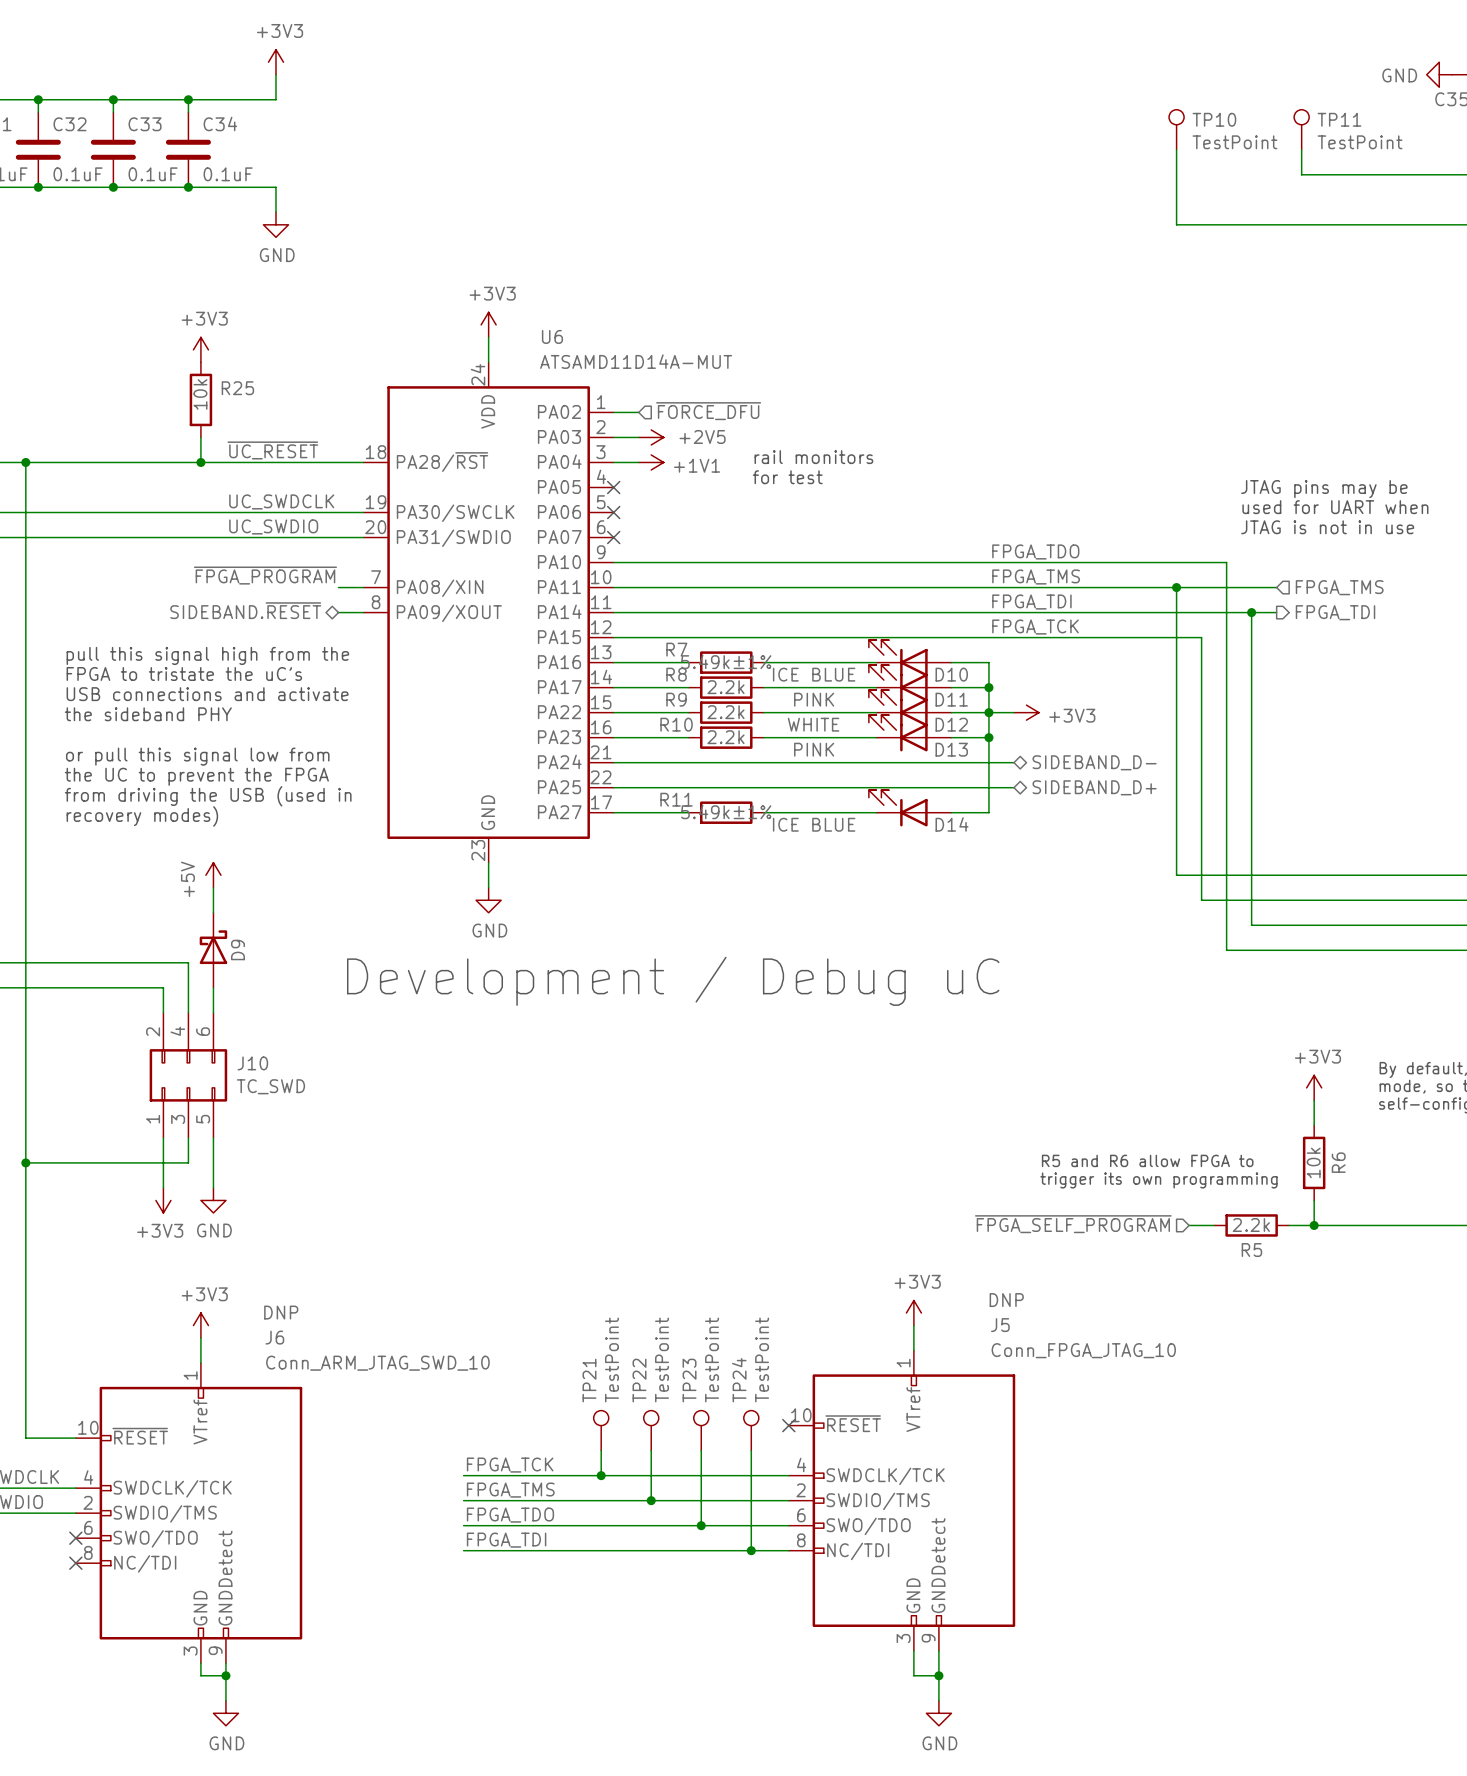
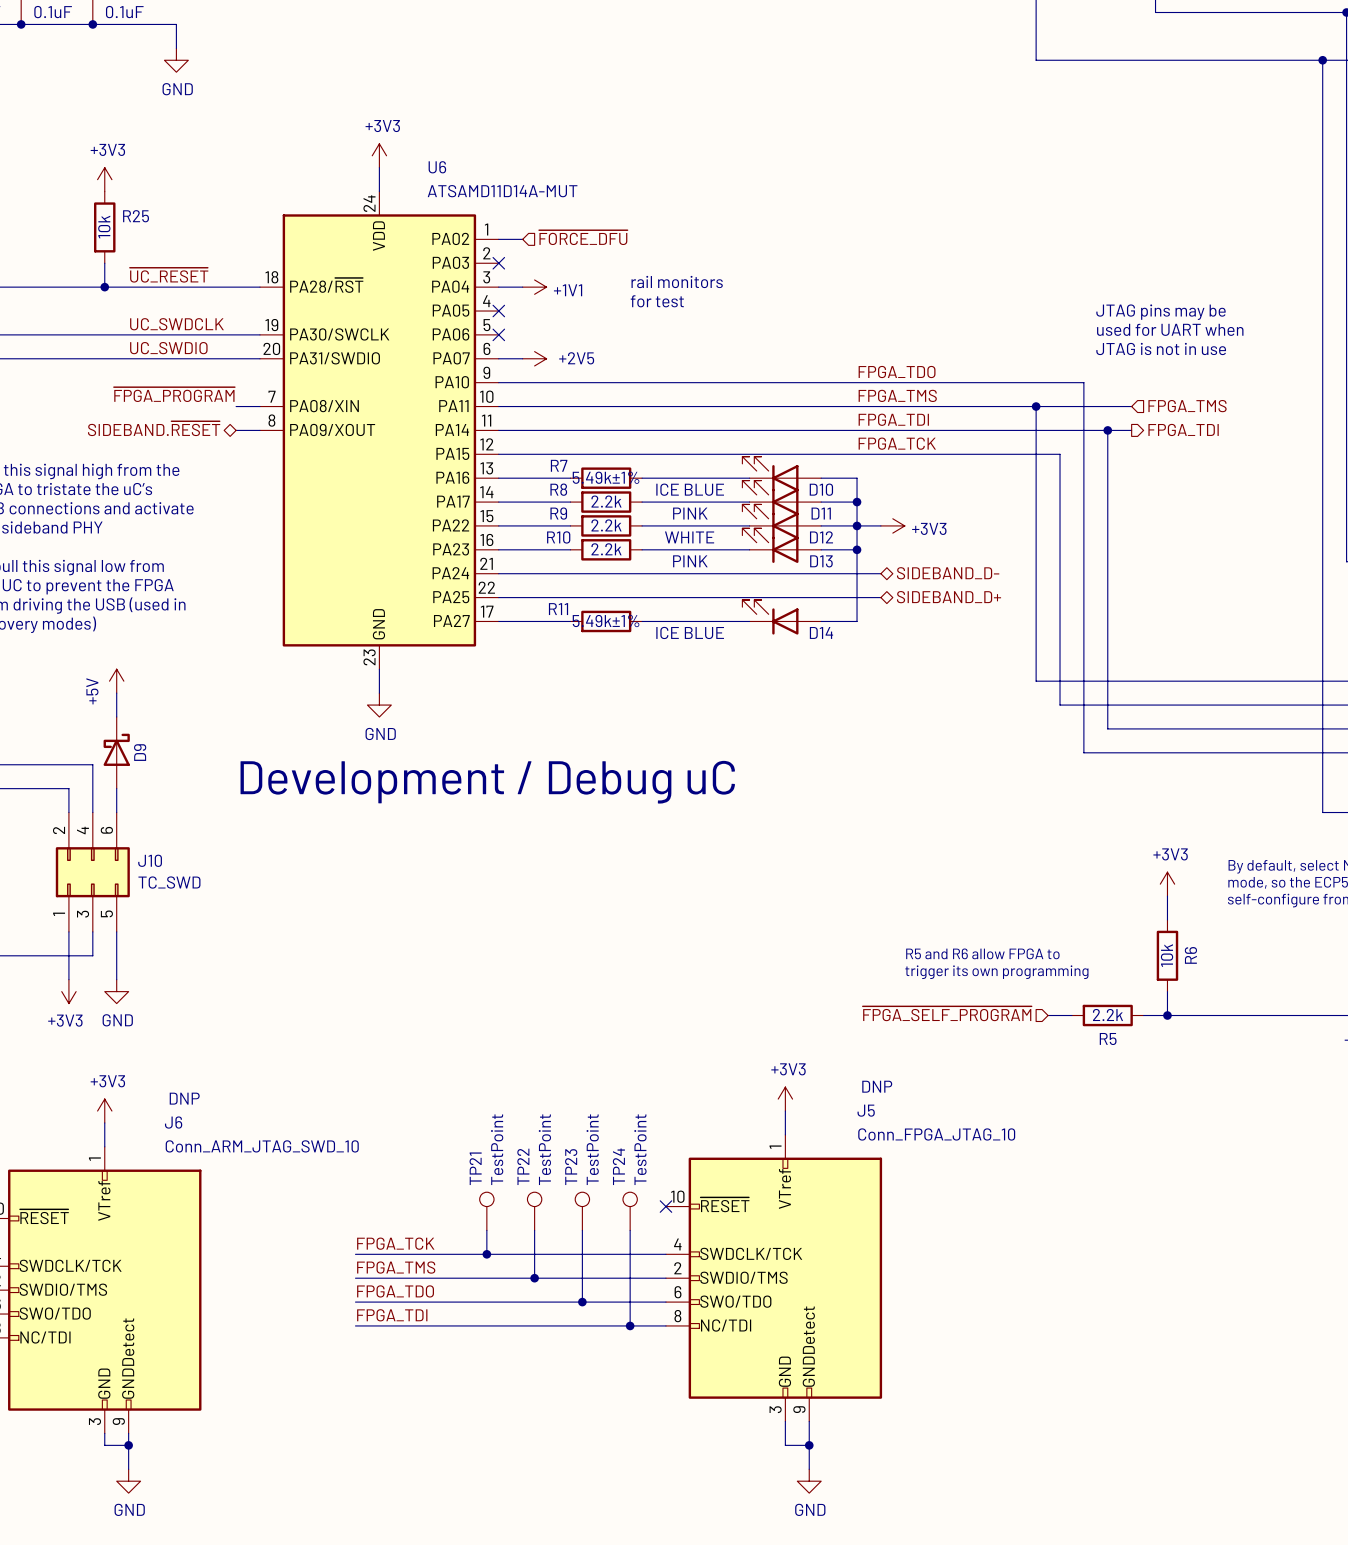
wire: (613, 437) (638, 437) -> (498, 358) (522, 358)
no-connect mark: none -> (498, 263)
power symbol position: +2V5 (651, 437) -> +2V5 (534, 358)
no-connect mark: (613, 537) -> none

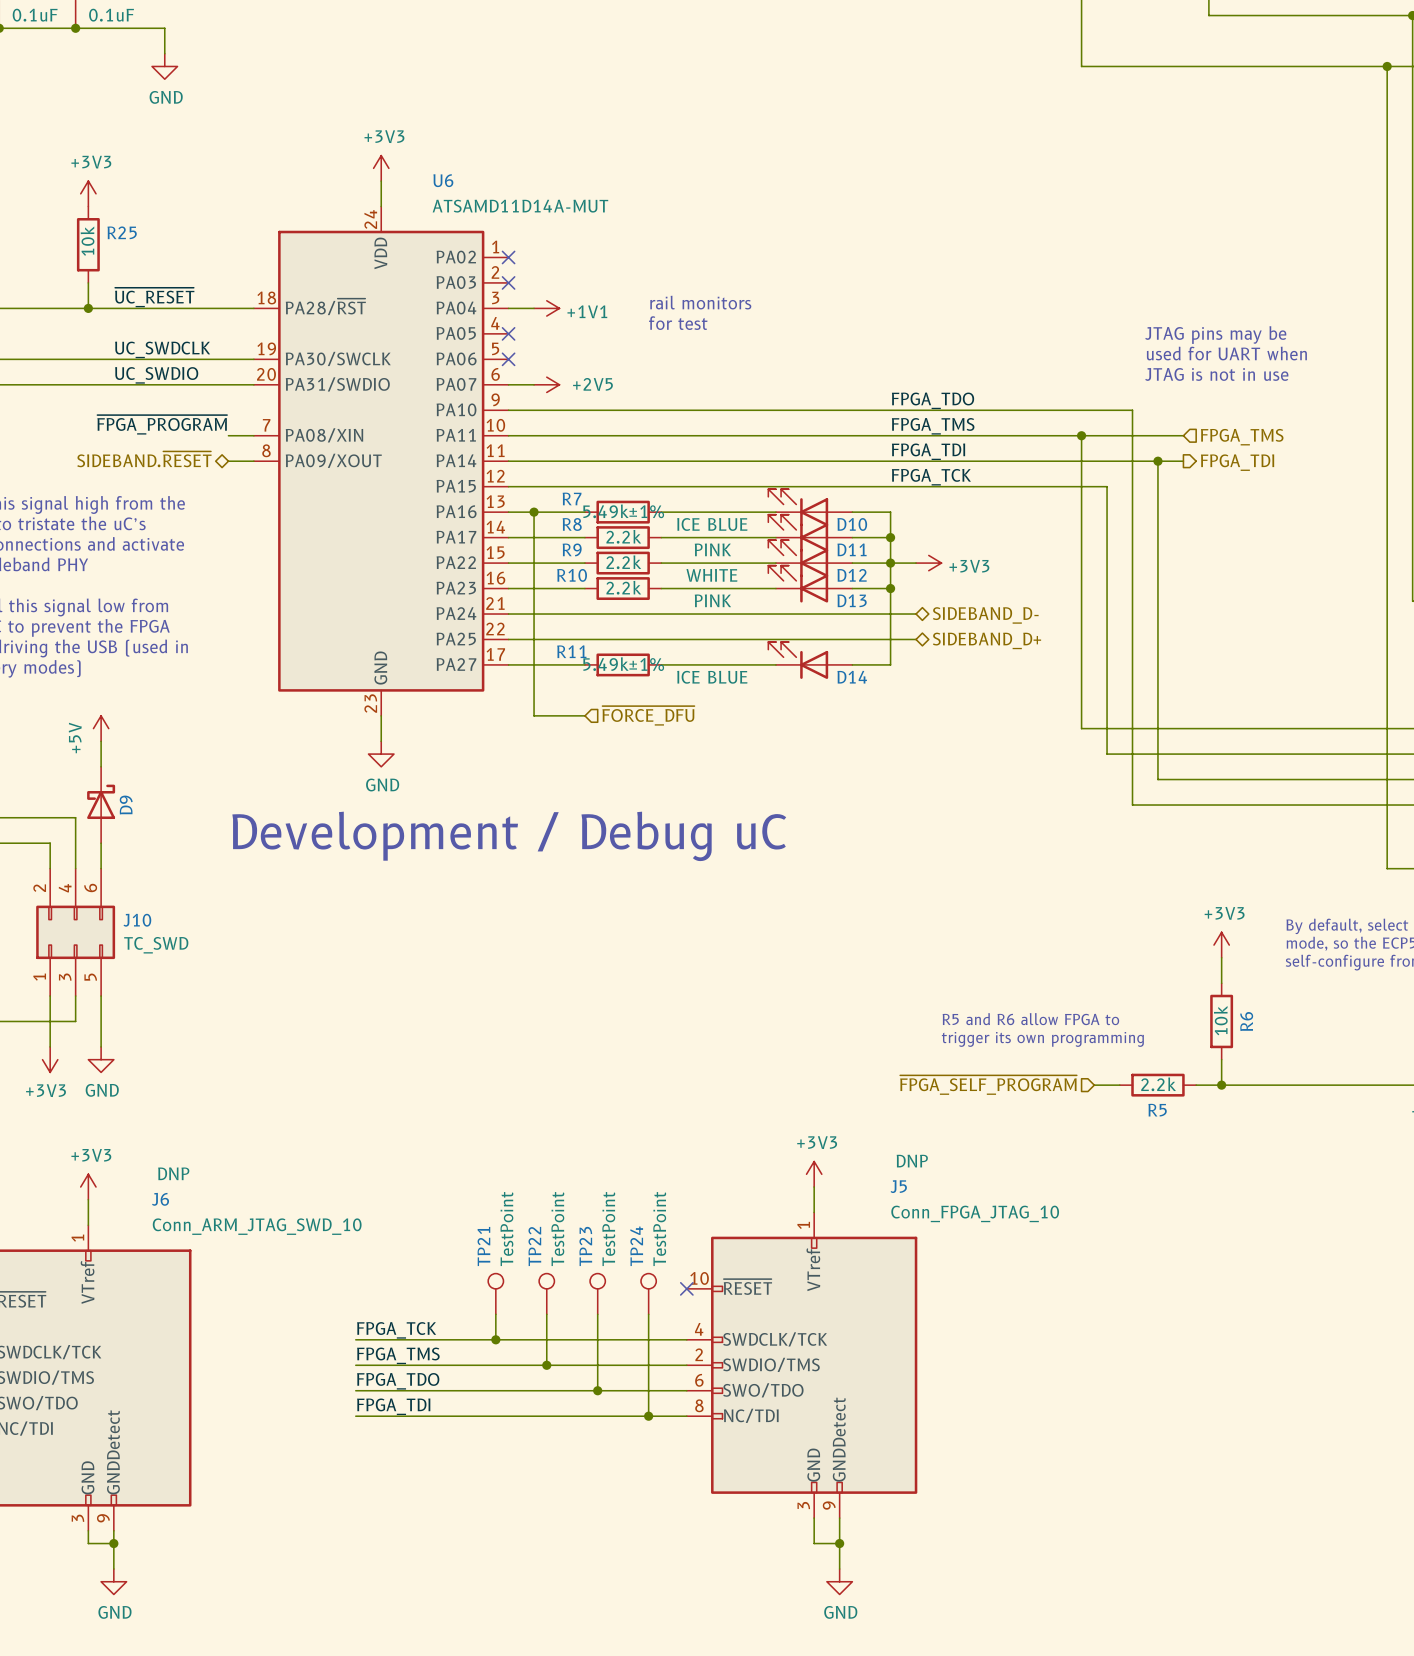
hierarchical label: ~{FORCE_DFU} (583, 237) -> none
wire: (498, 239) (522, 239) -> none
no-connect mark: none -> (508, 257)
wire: none -> (534, 512) (534, 715) (584, 715)
junction: none -> (534, 512)
hierarchical label: none -> ~{FORCE_DFU} (648, 715)

